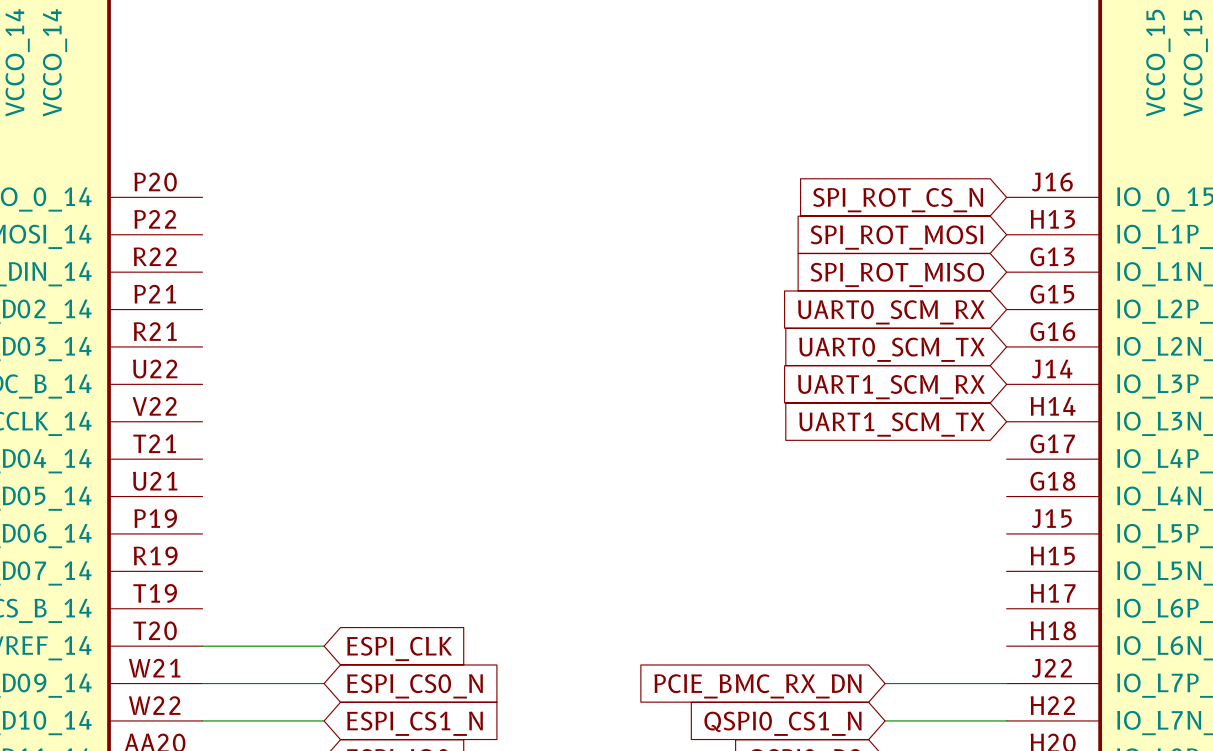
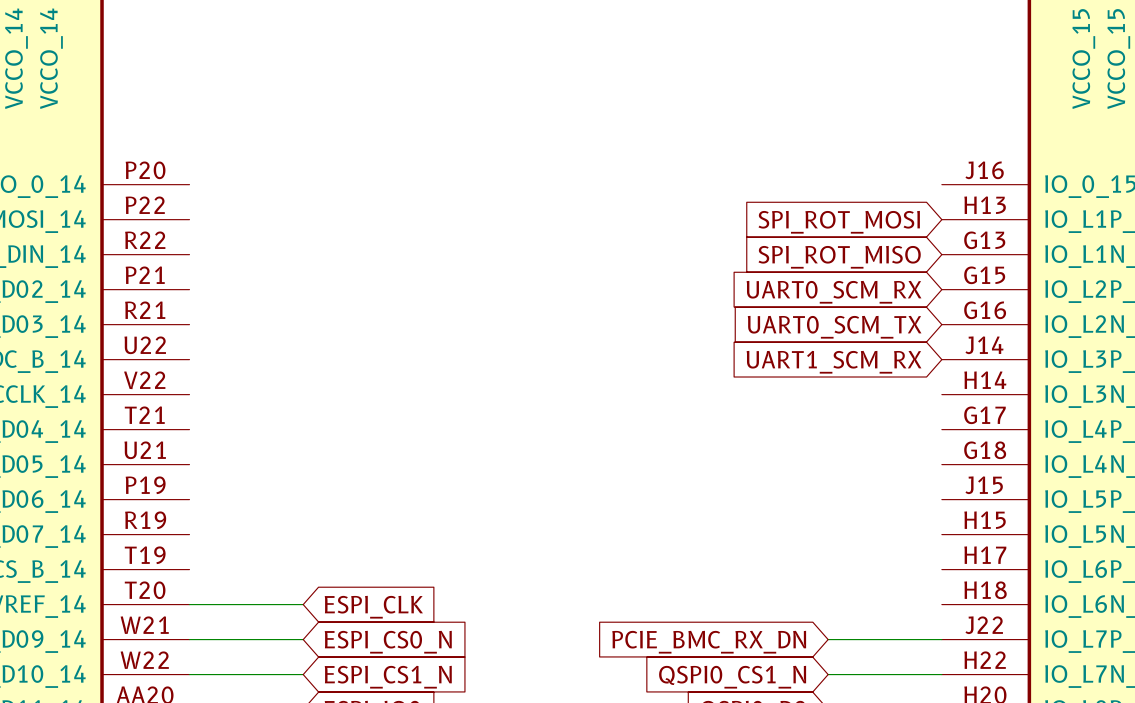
global label: SPI_ROT_CS_N (898, 200) -> none
global label: UART1_SCM_TX (892, 424) -> none

